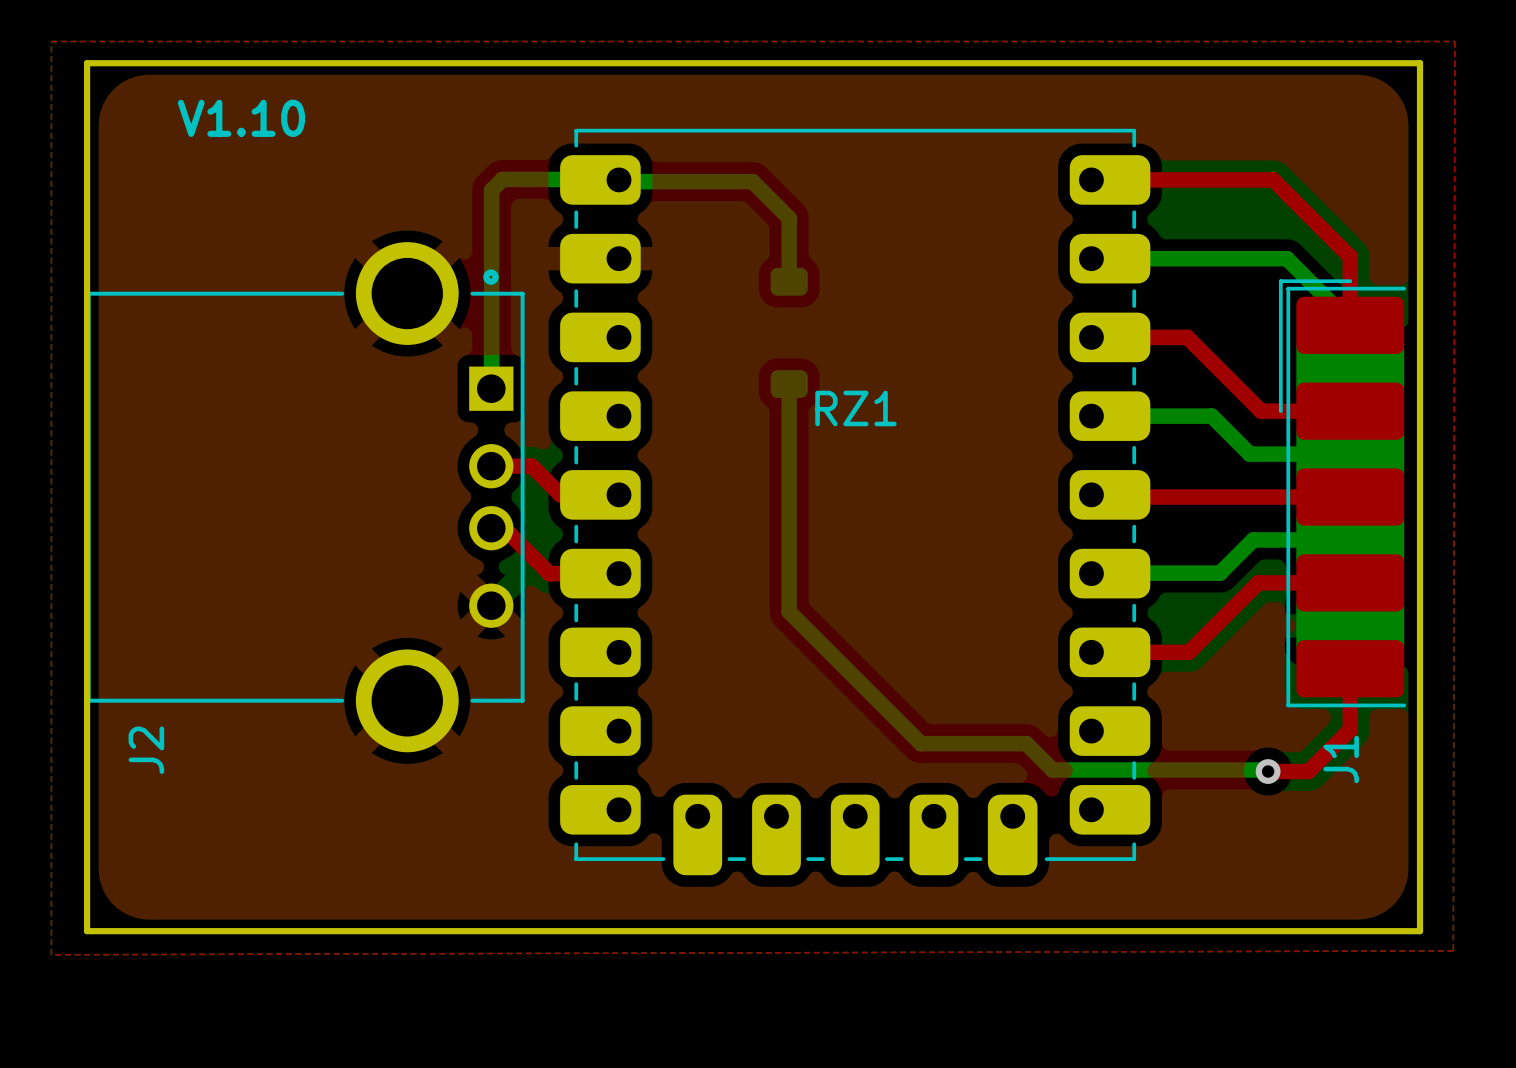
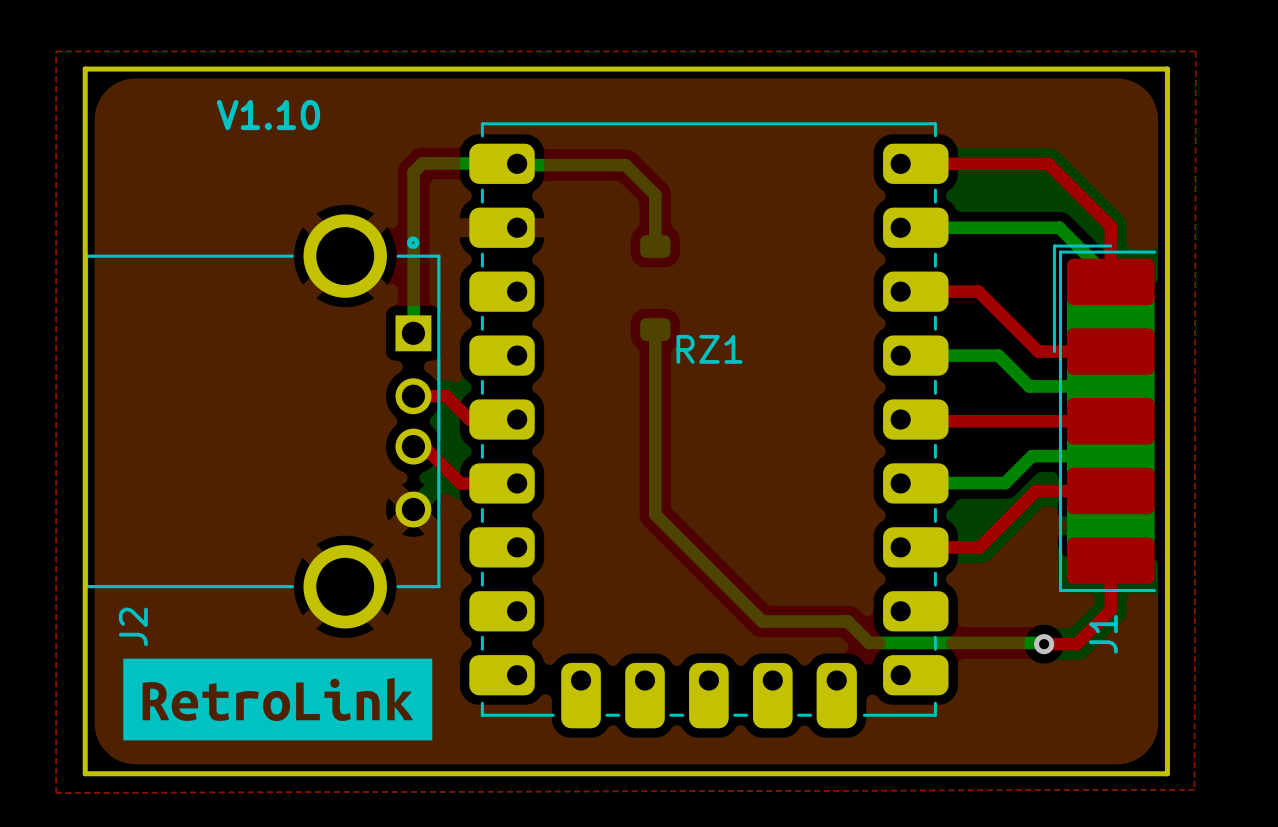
text position: V1.10 (241, 118) -> V1.10 (268, 115)
drawing: none -> [123, 658, 433, 741]

